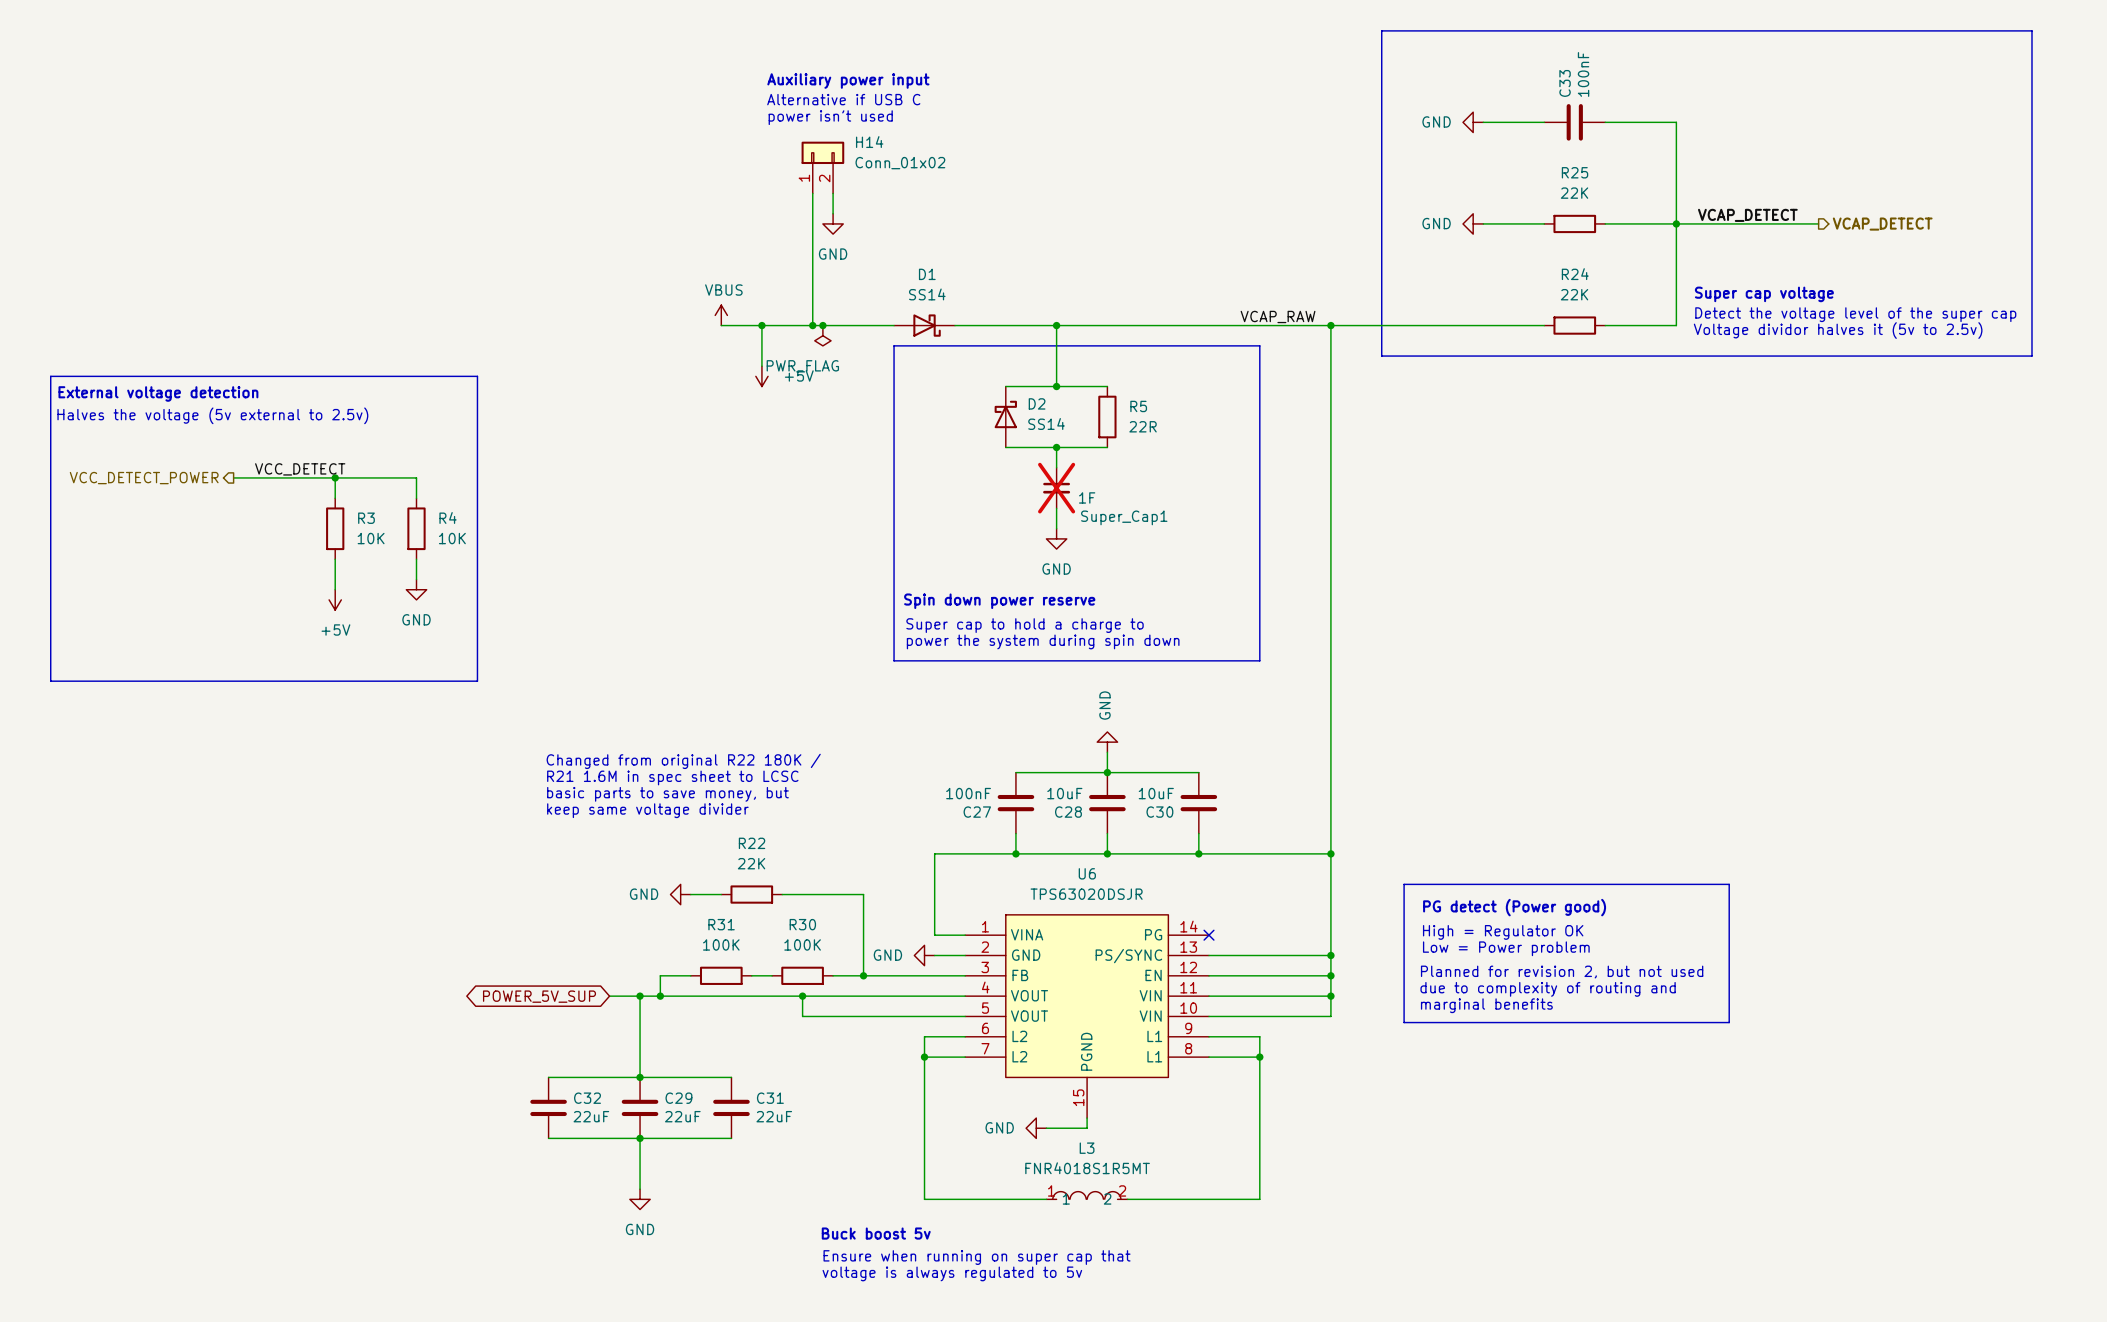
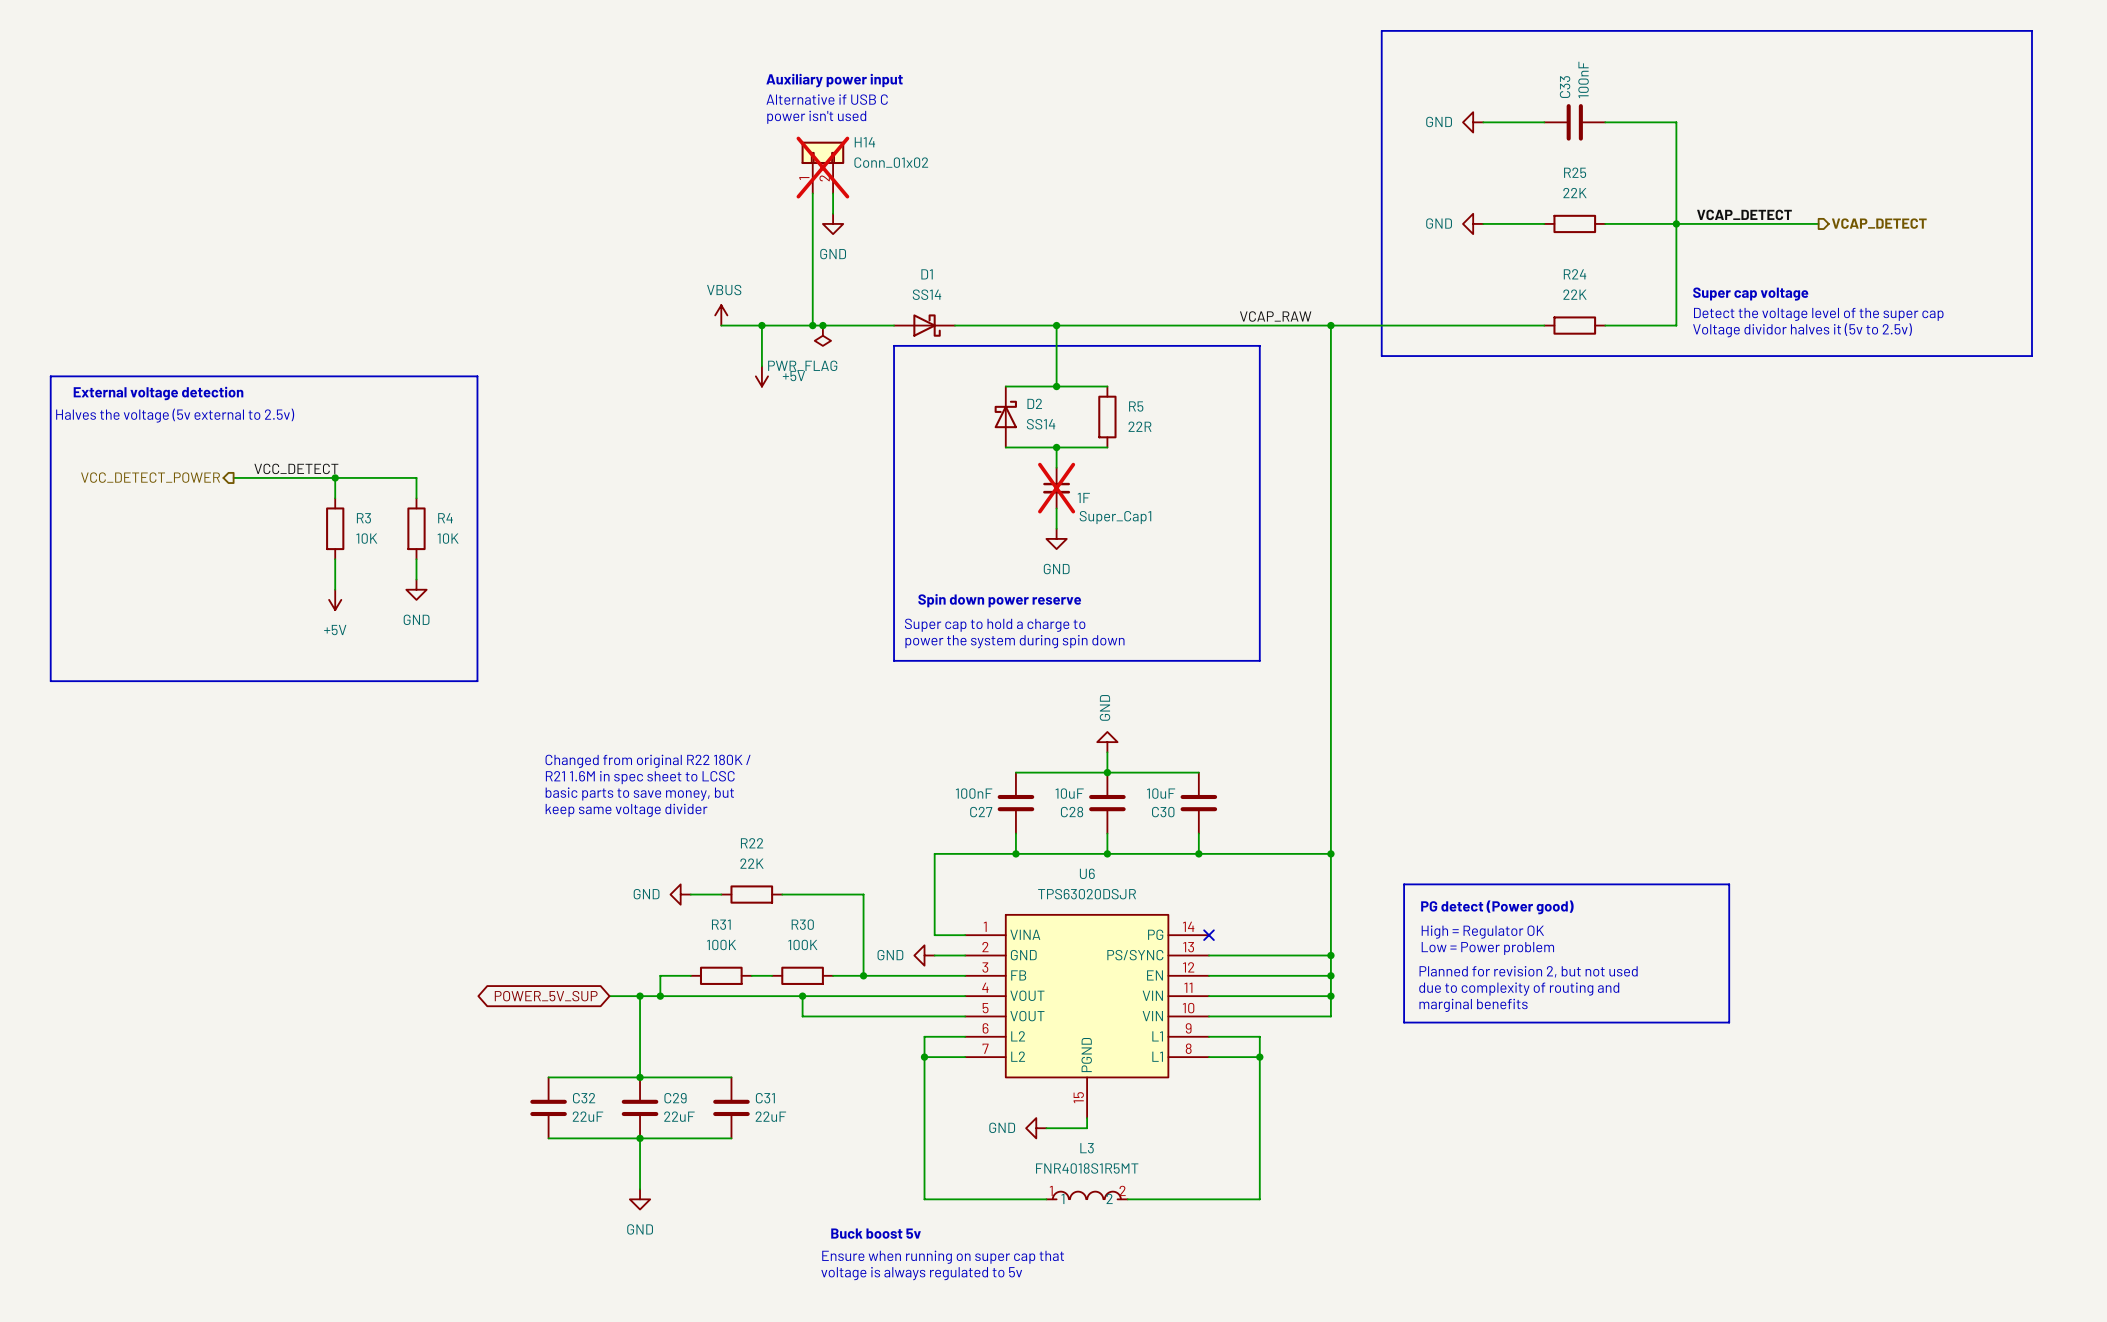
H14 do-not-place cross: none -> (822, 167)

